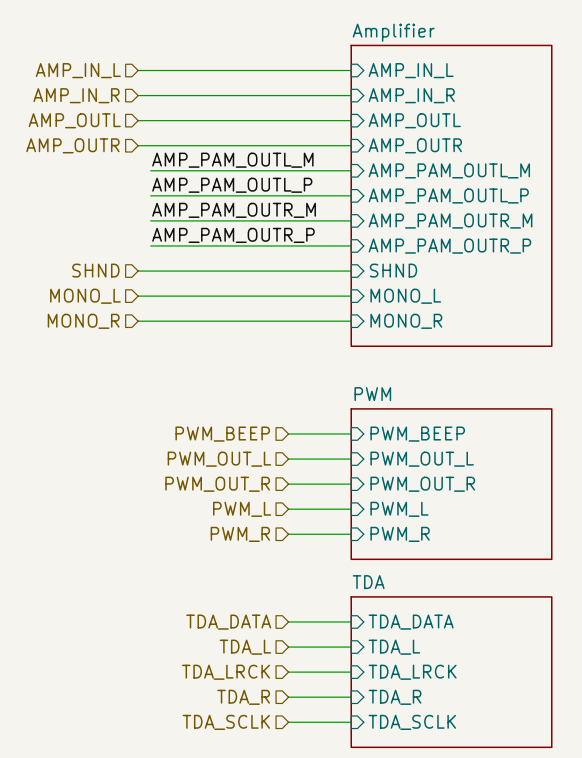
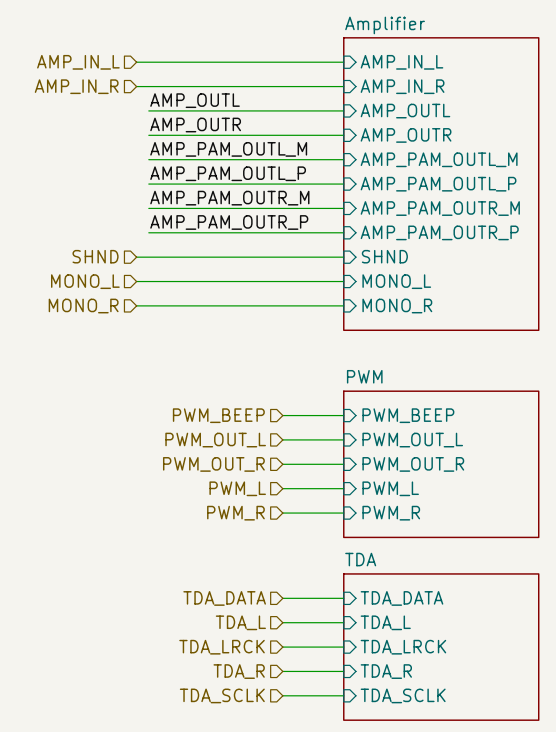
label: none -> AMP_OUTL (195, 100)
hierarchical label: AMP_OUTL (74, 120) -> none
wire: (138, 120) (150, 120) -> none
label: none -> AMP_OUTR (195, 125)
hierarchical label: AMP_OUTR (72, 145) -> none
wire: (138, 145) (150, 145) -> none

